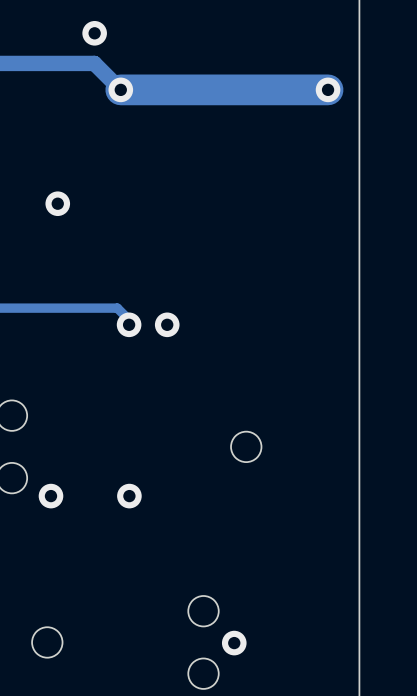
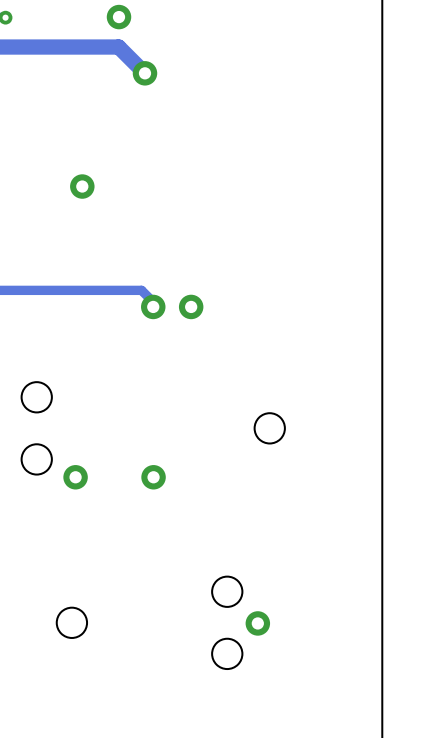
track: (328, 89) (120, 89) -> none
via: (328, 89) -> none

